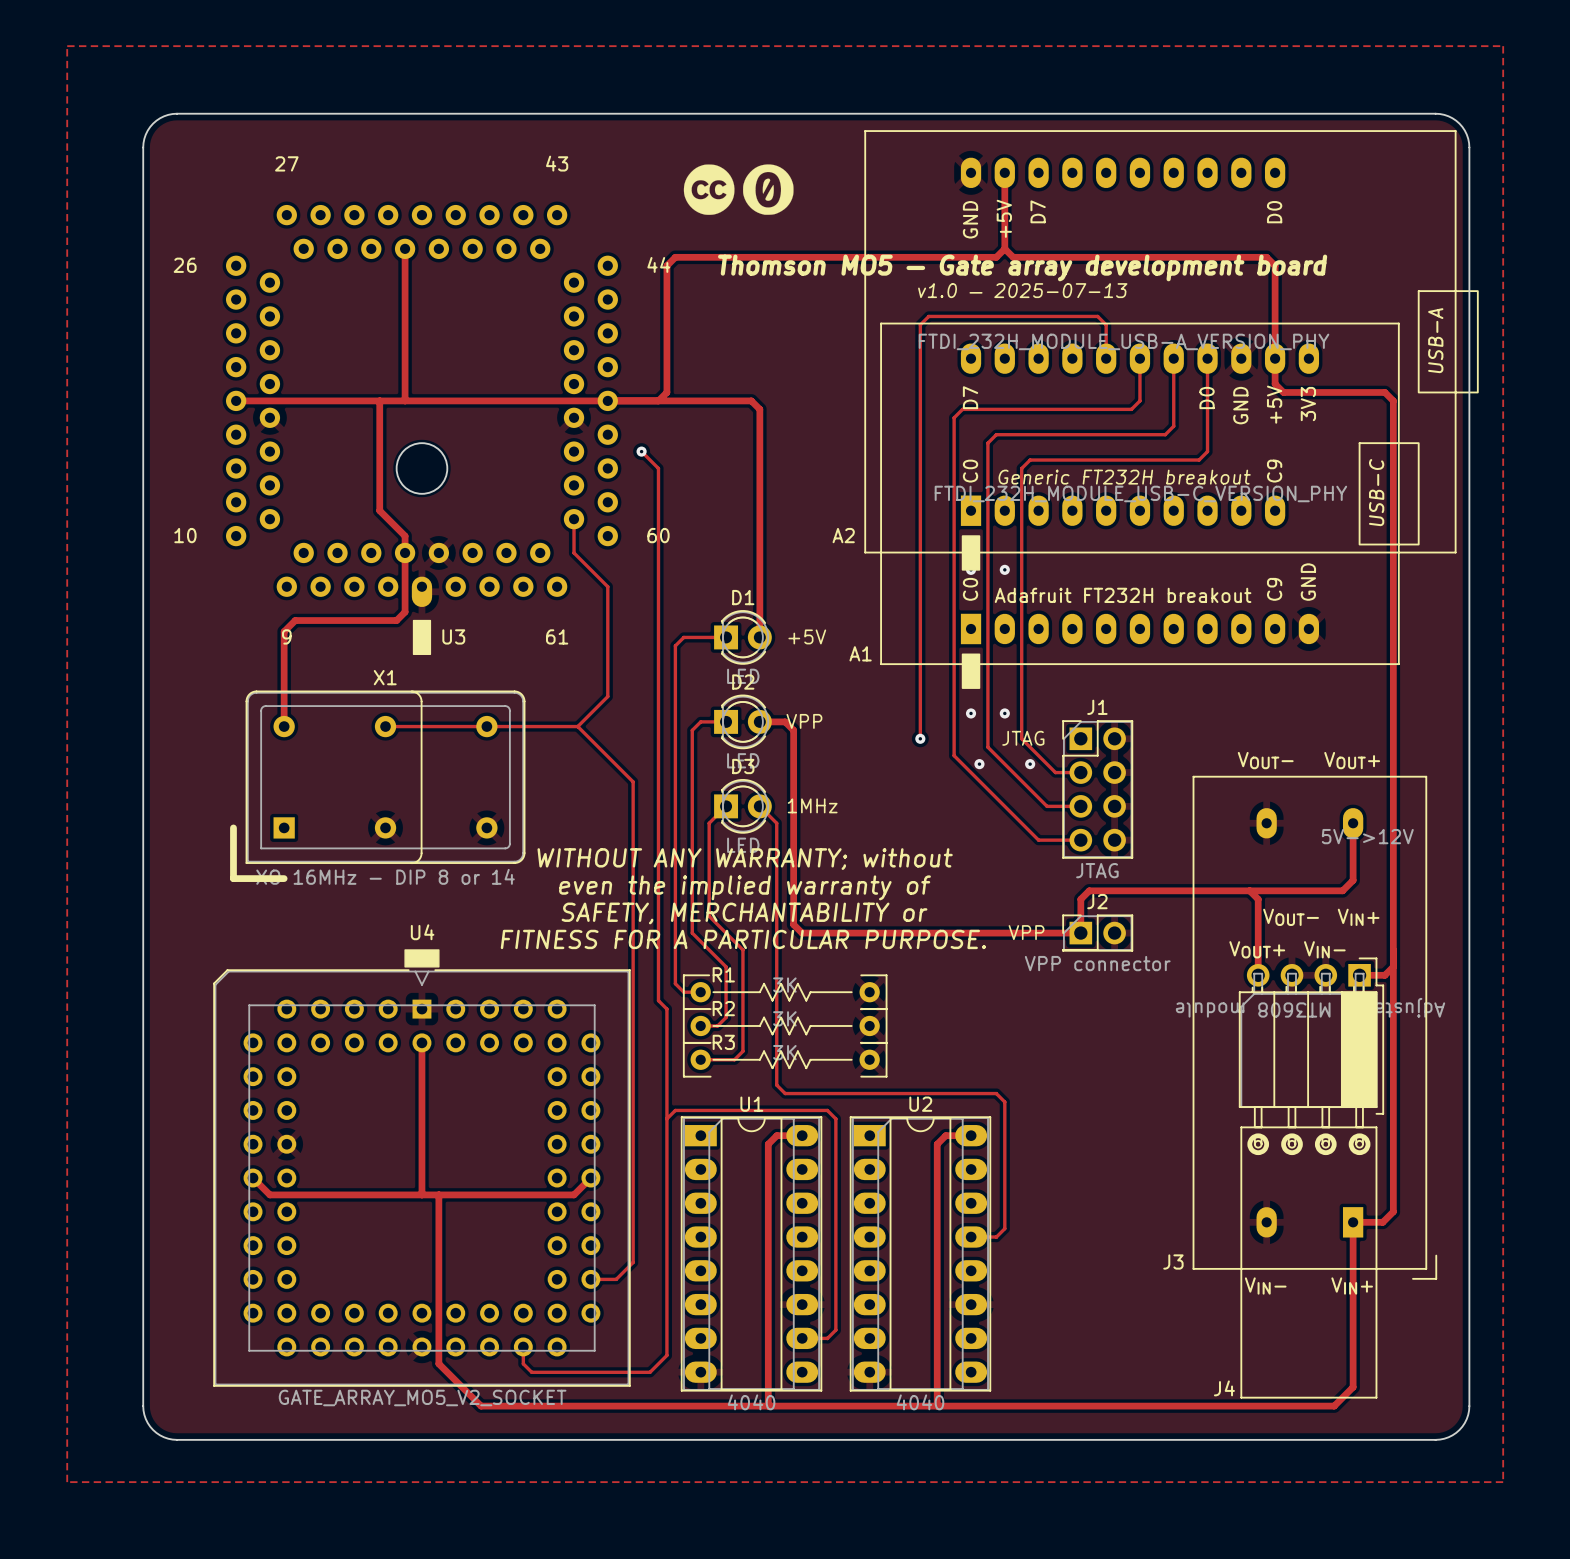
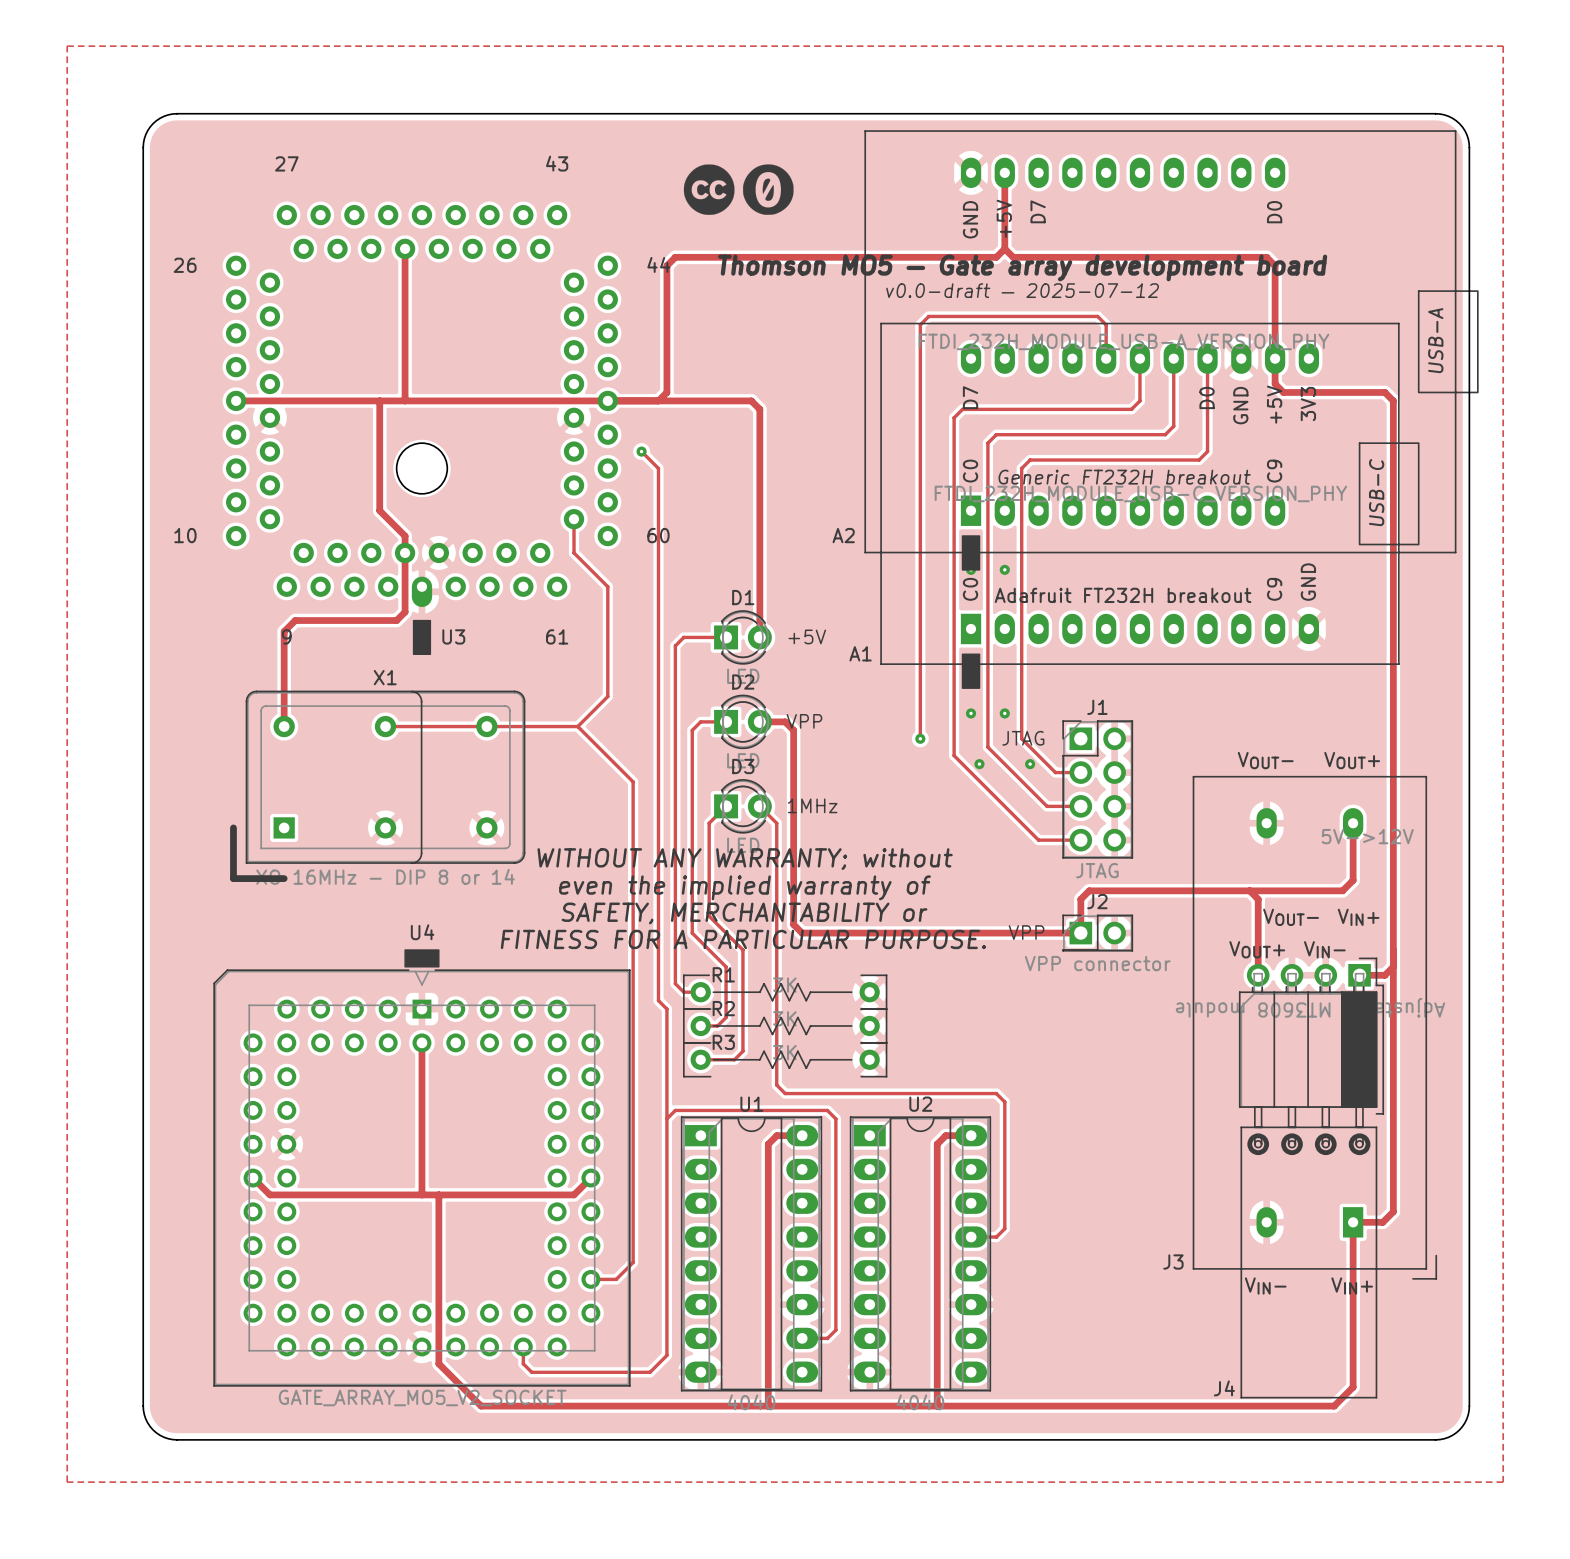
text: v1.0 — 2025-07-13 (1022, 290) -> v0.0-draft — 2025-07-12 (1022, 290)

